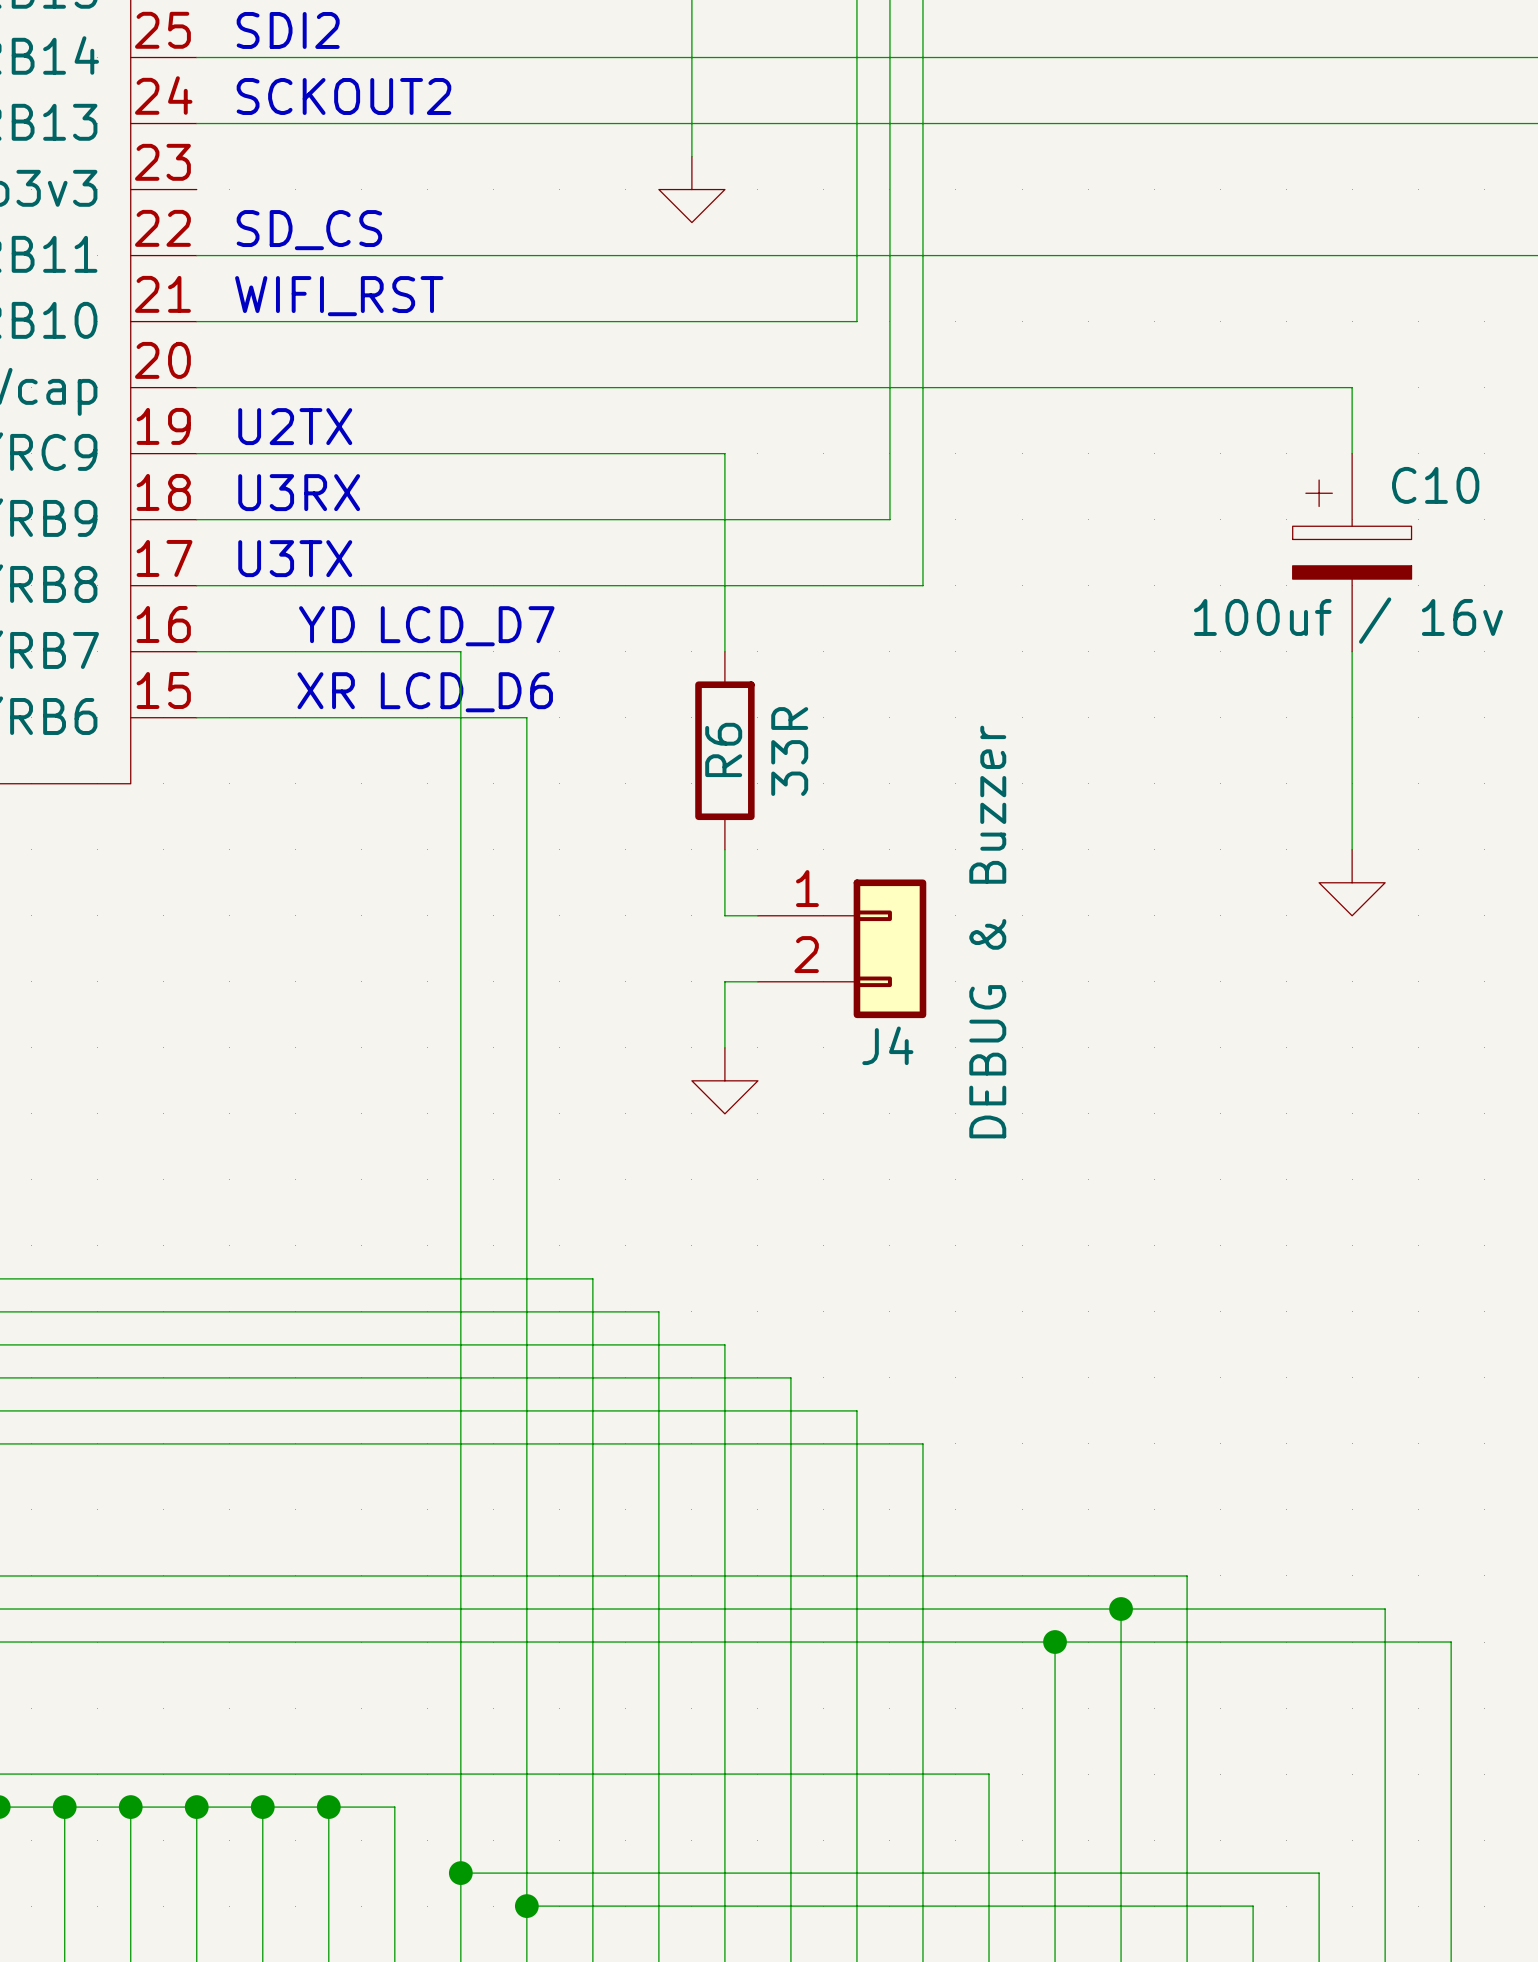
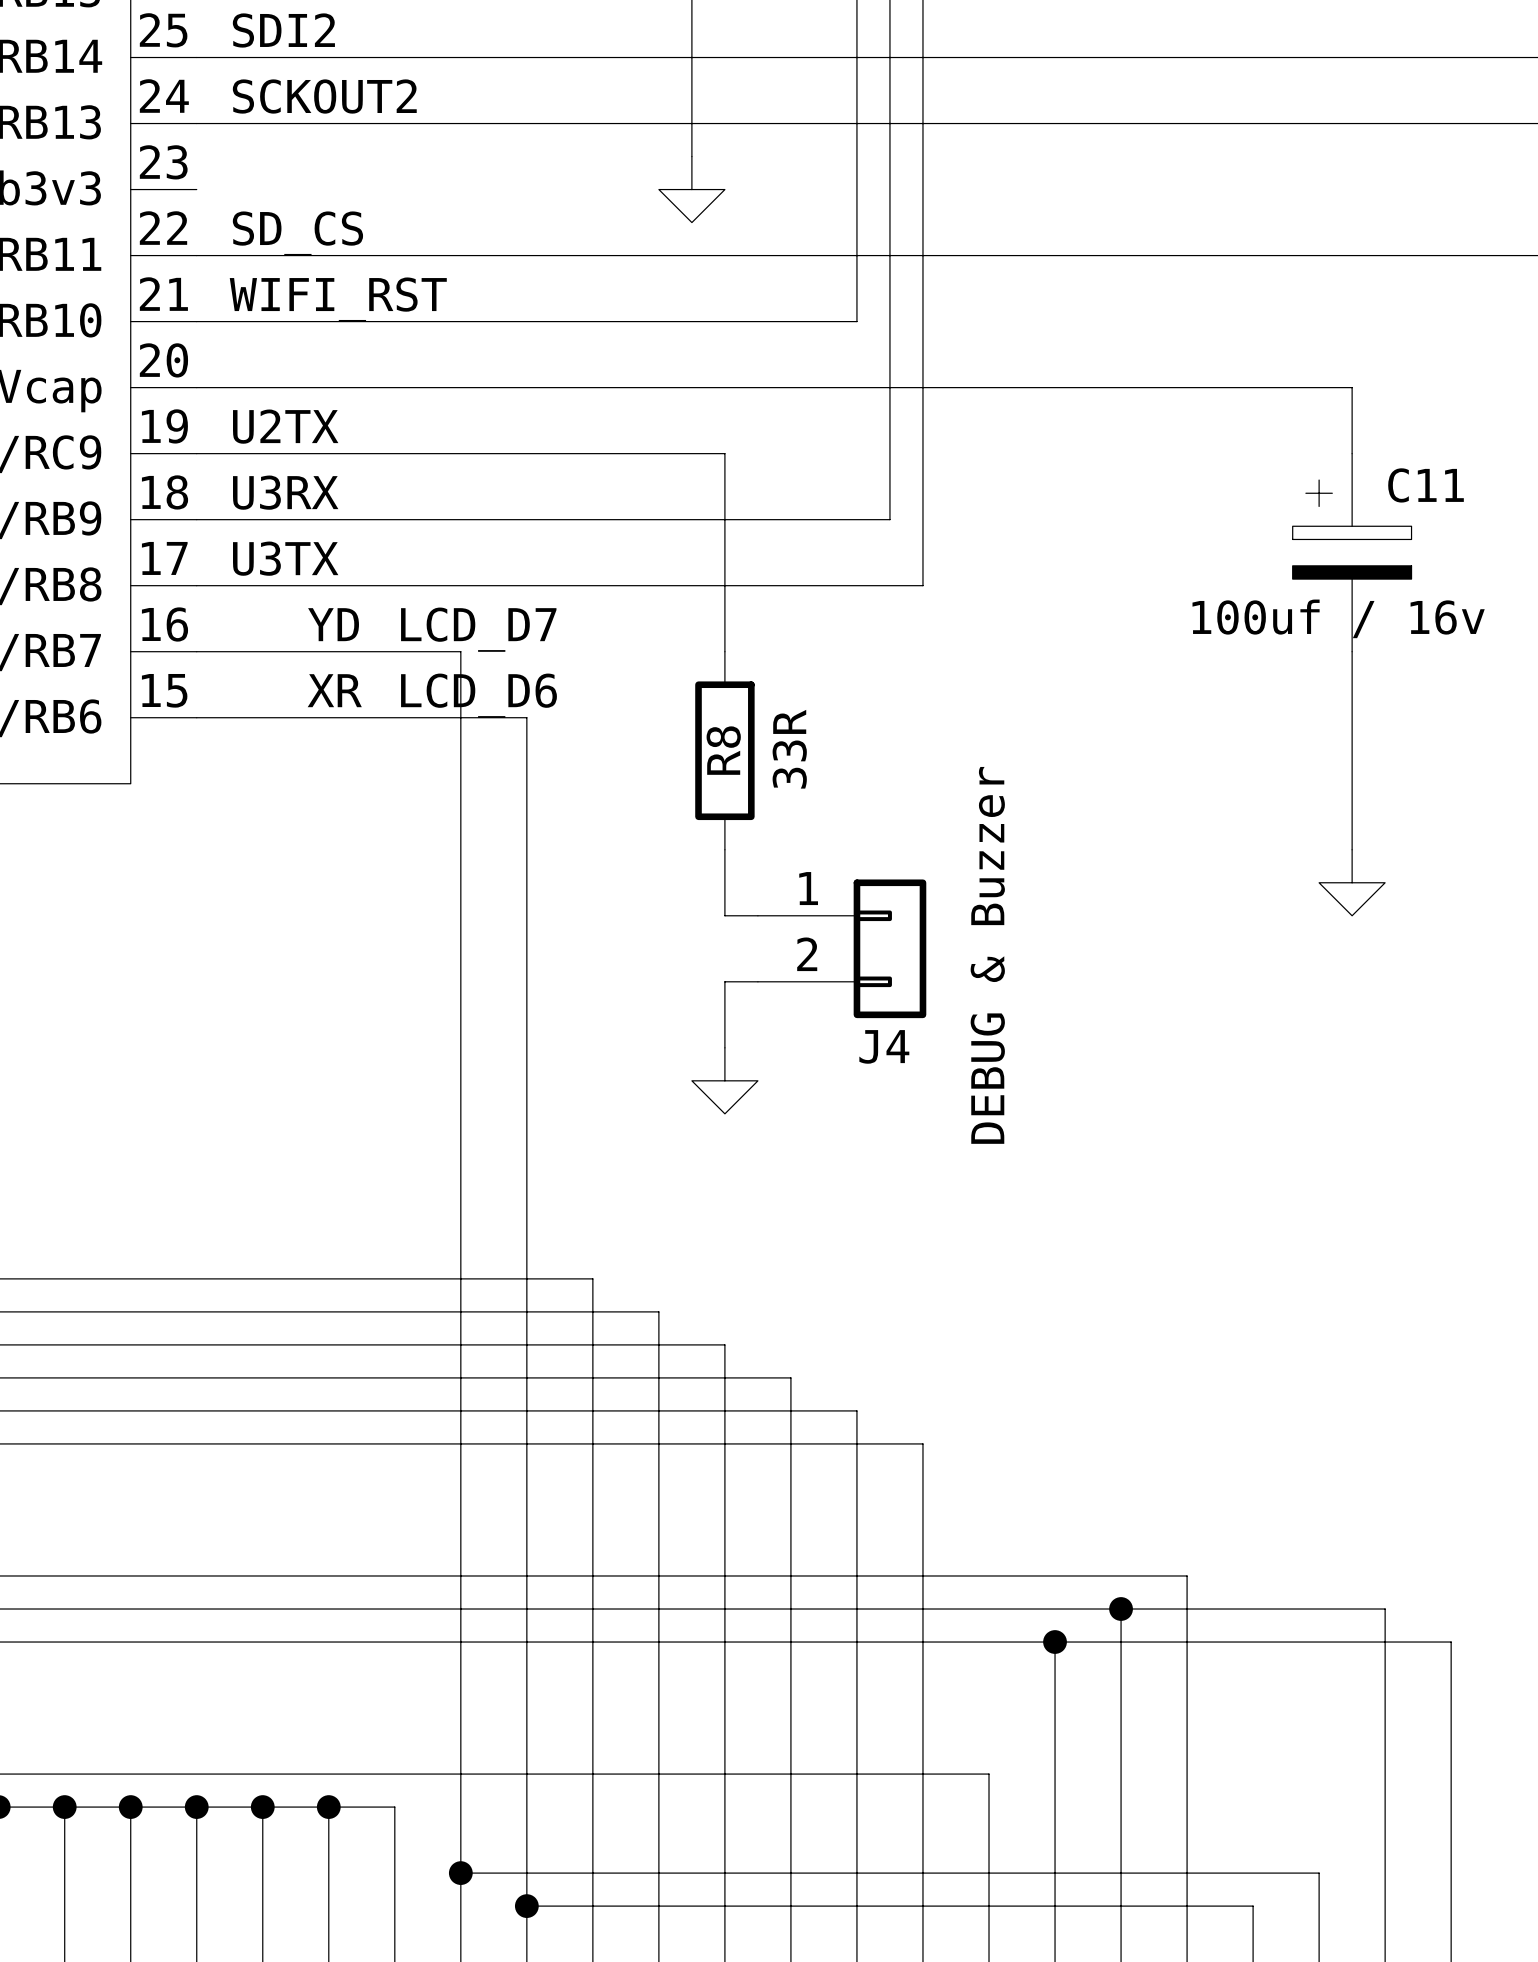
C10 name: C10 (1435, 485) -> C11 (1426, 485)
R6 name: R6 (723, 749) -> R8 (723, 750)

